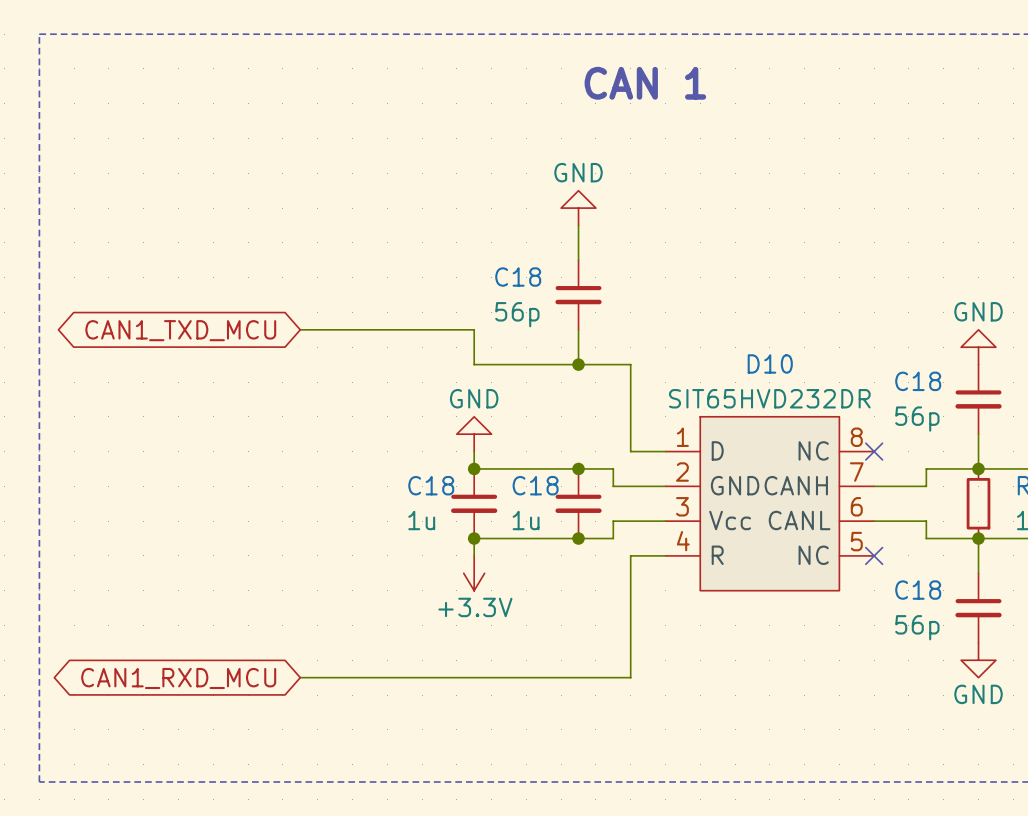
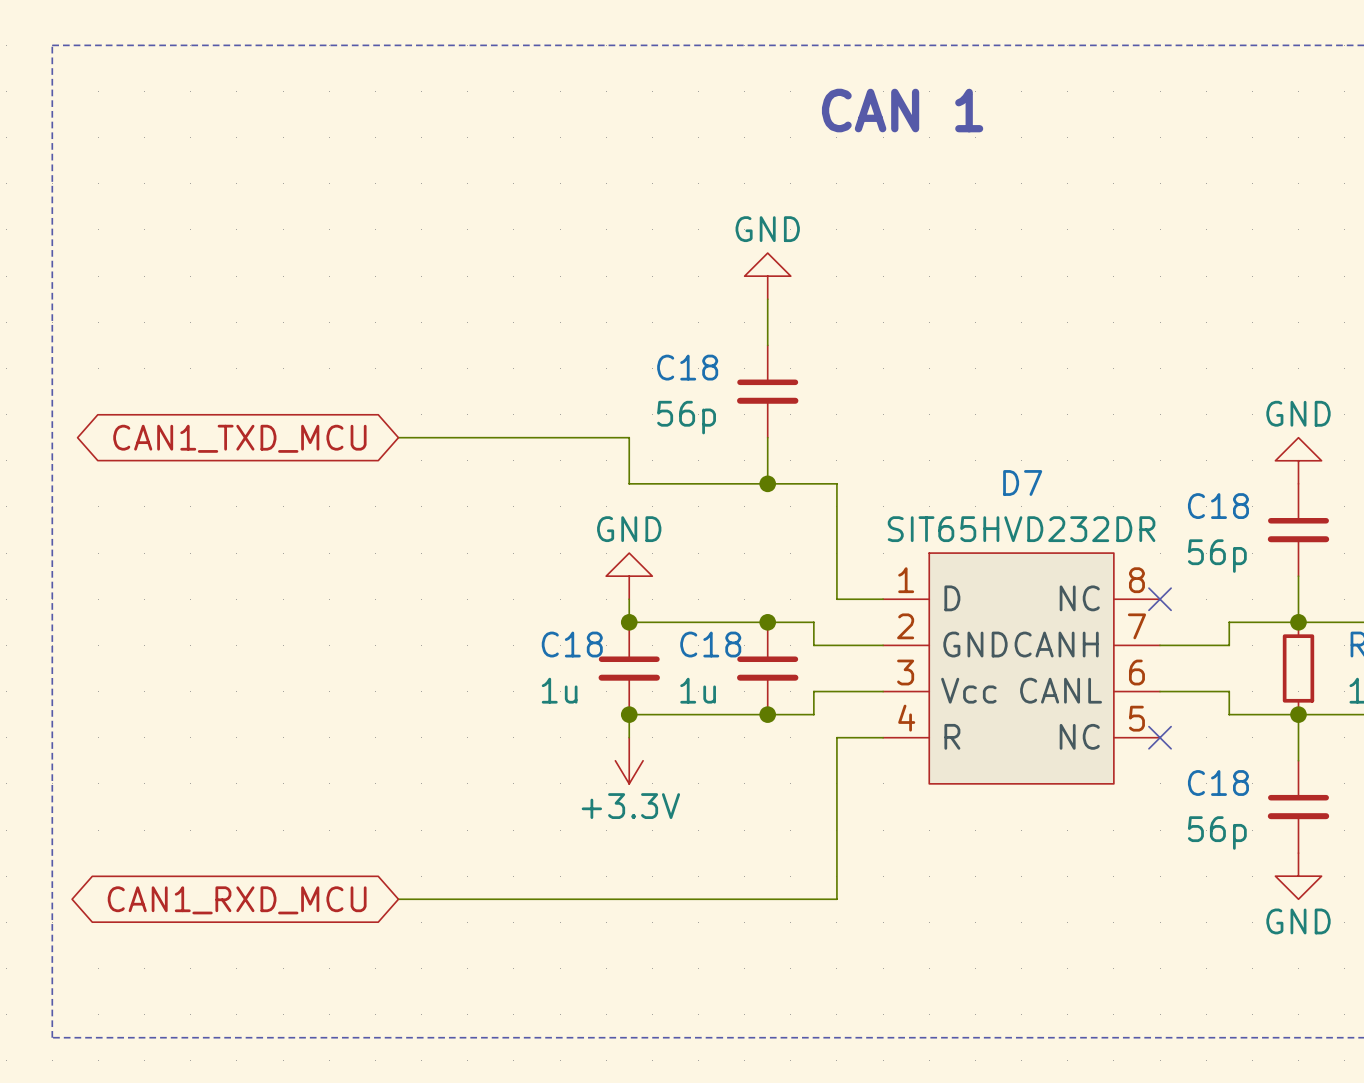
text position: CAN 1 (645, 83) -> CAN 1 (902, 110)
D10 name: D10 (770, 363) -> D7 (1022, 482)

